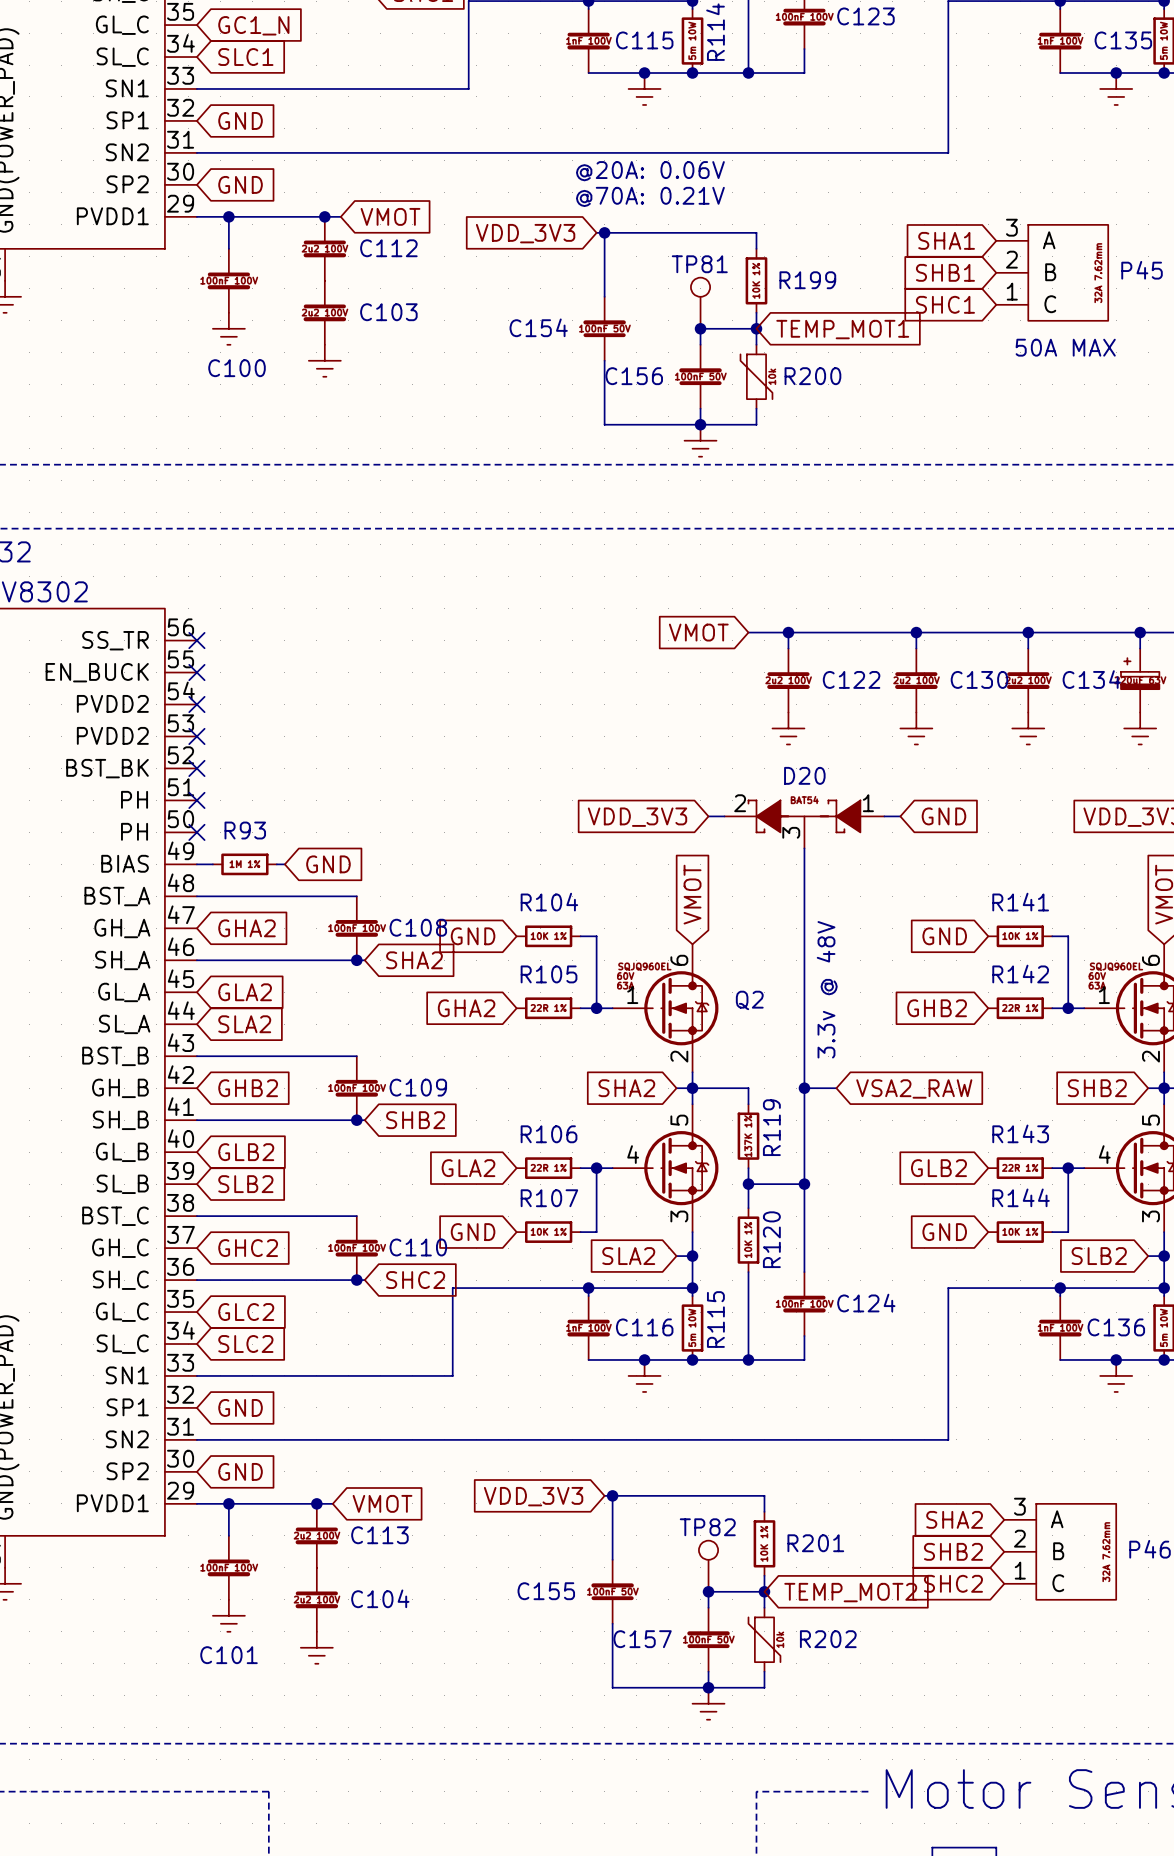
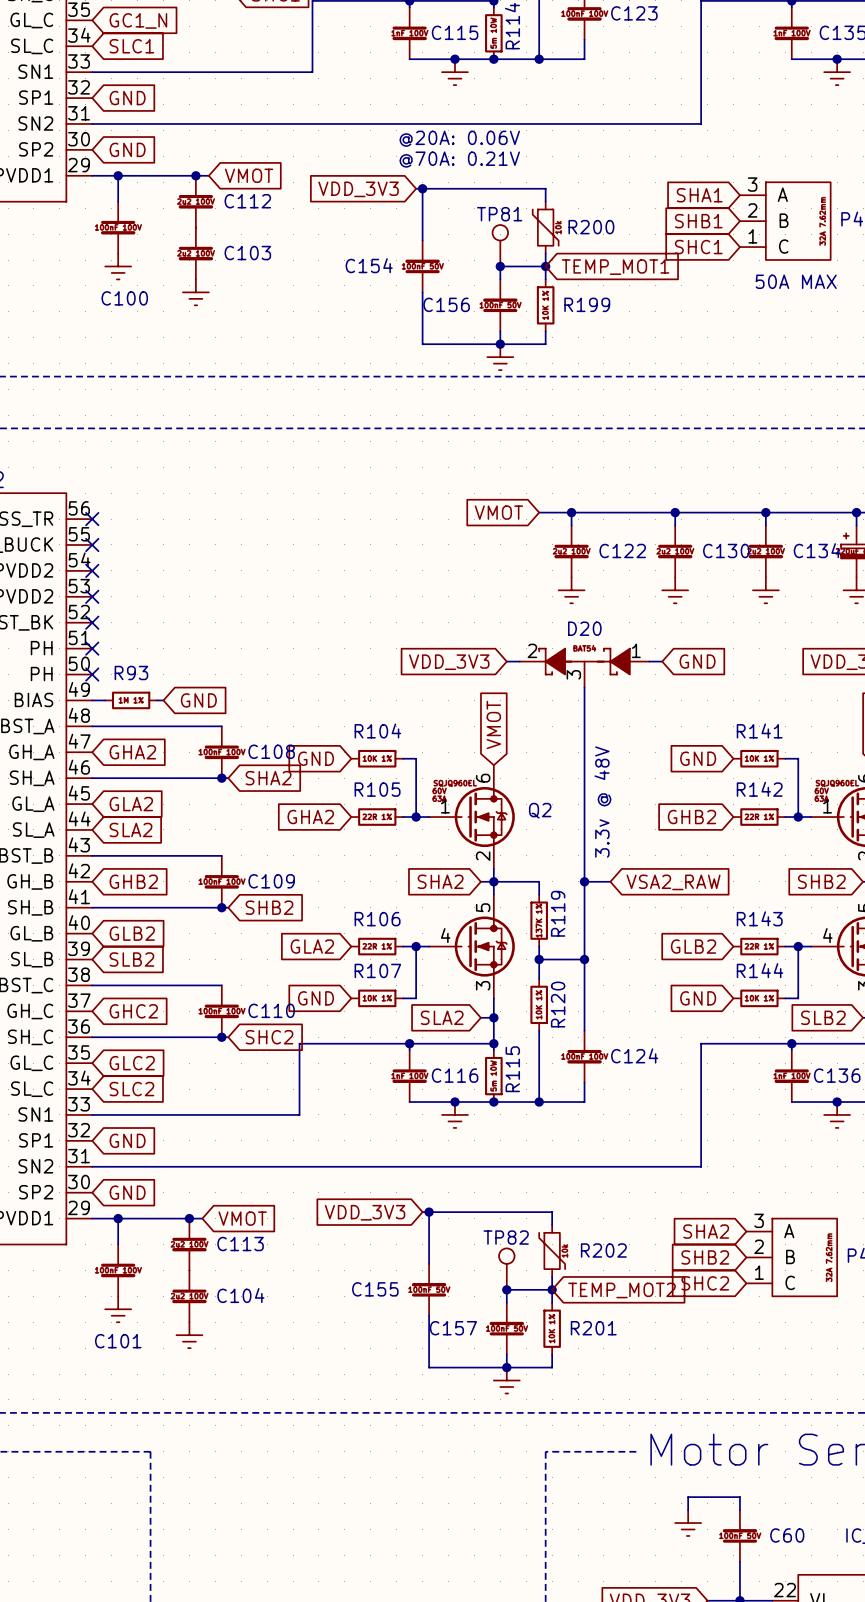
R199 position: (756, 280) -> (545, 305)
R200 position: (756, 376) -> (545, 227)
R201 position: (764, 1543) -> (552, 1328)
R202 position: (764, 1639) -> (552, 1250)

